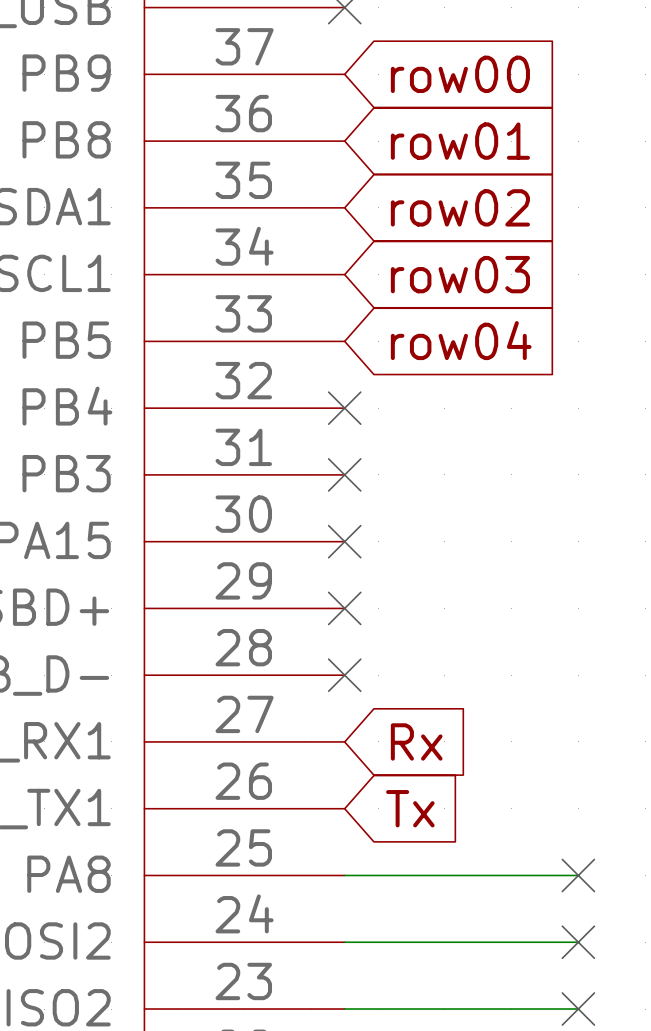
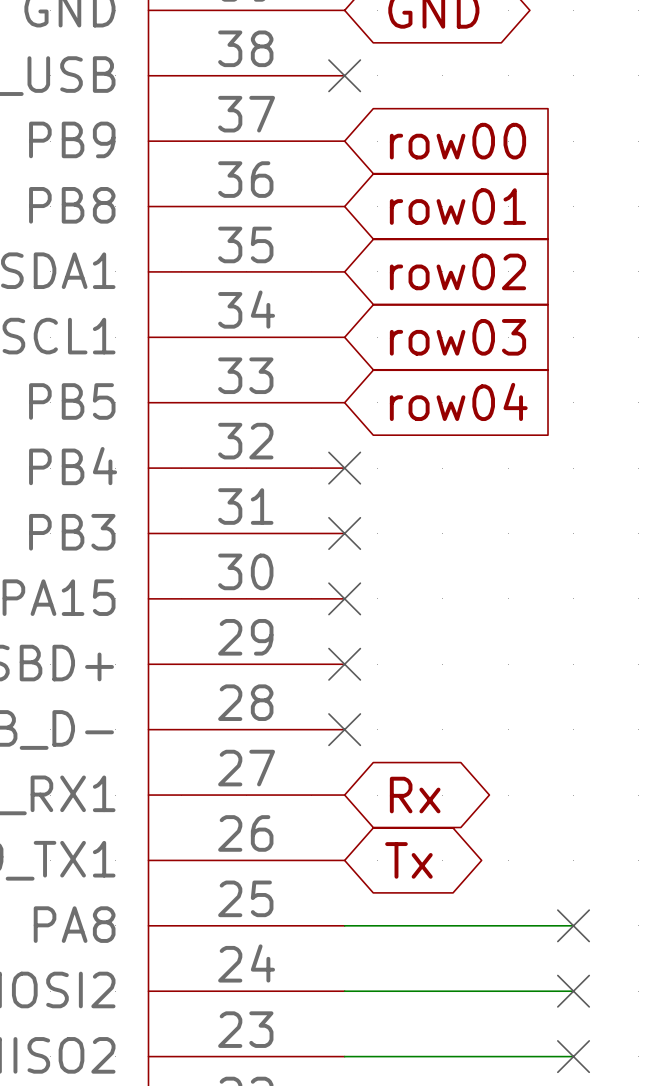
global label shape: input (416, 741) -> bidirectional (415, 795)
global label shape: input (410, 808) -> bidirectional (408, 860)

